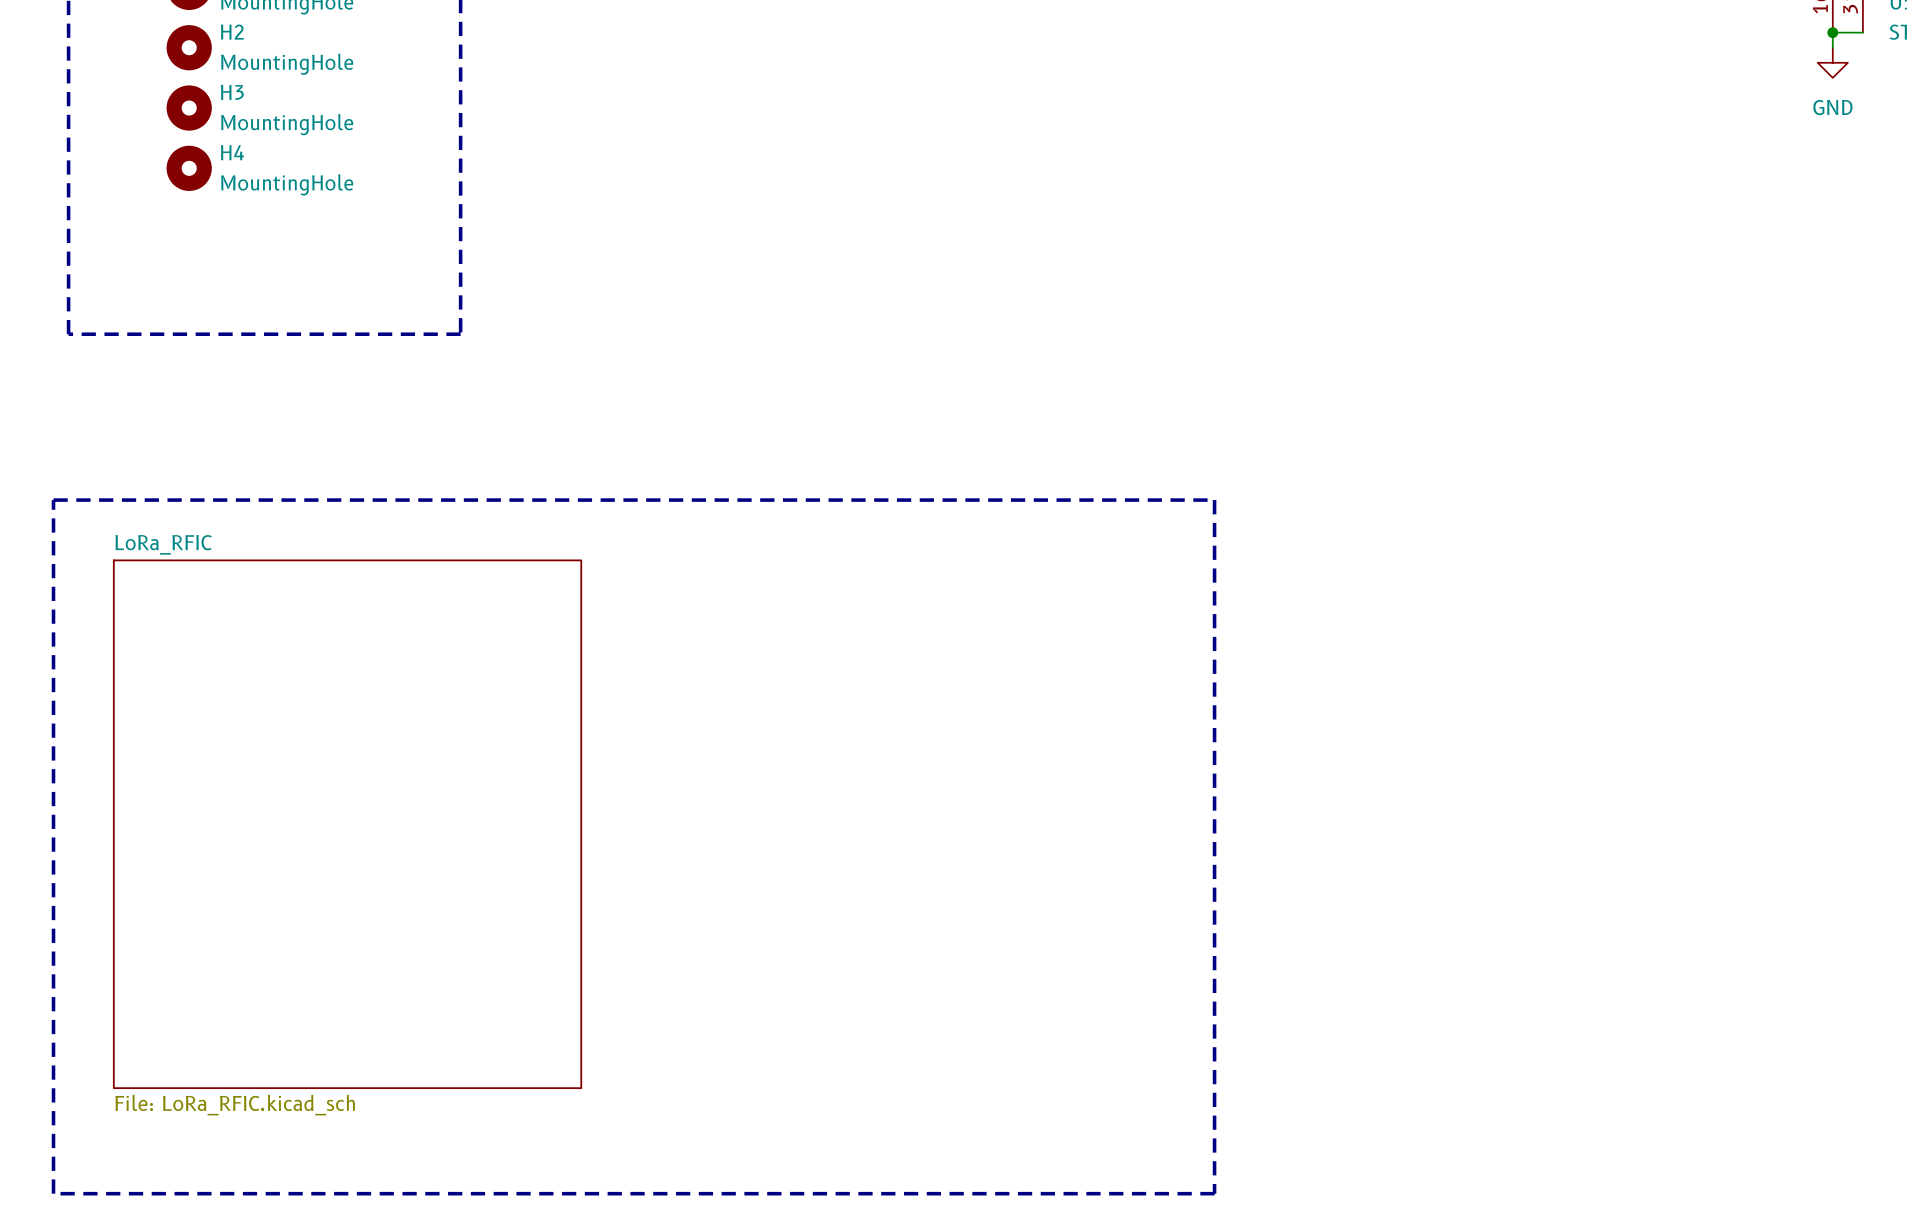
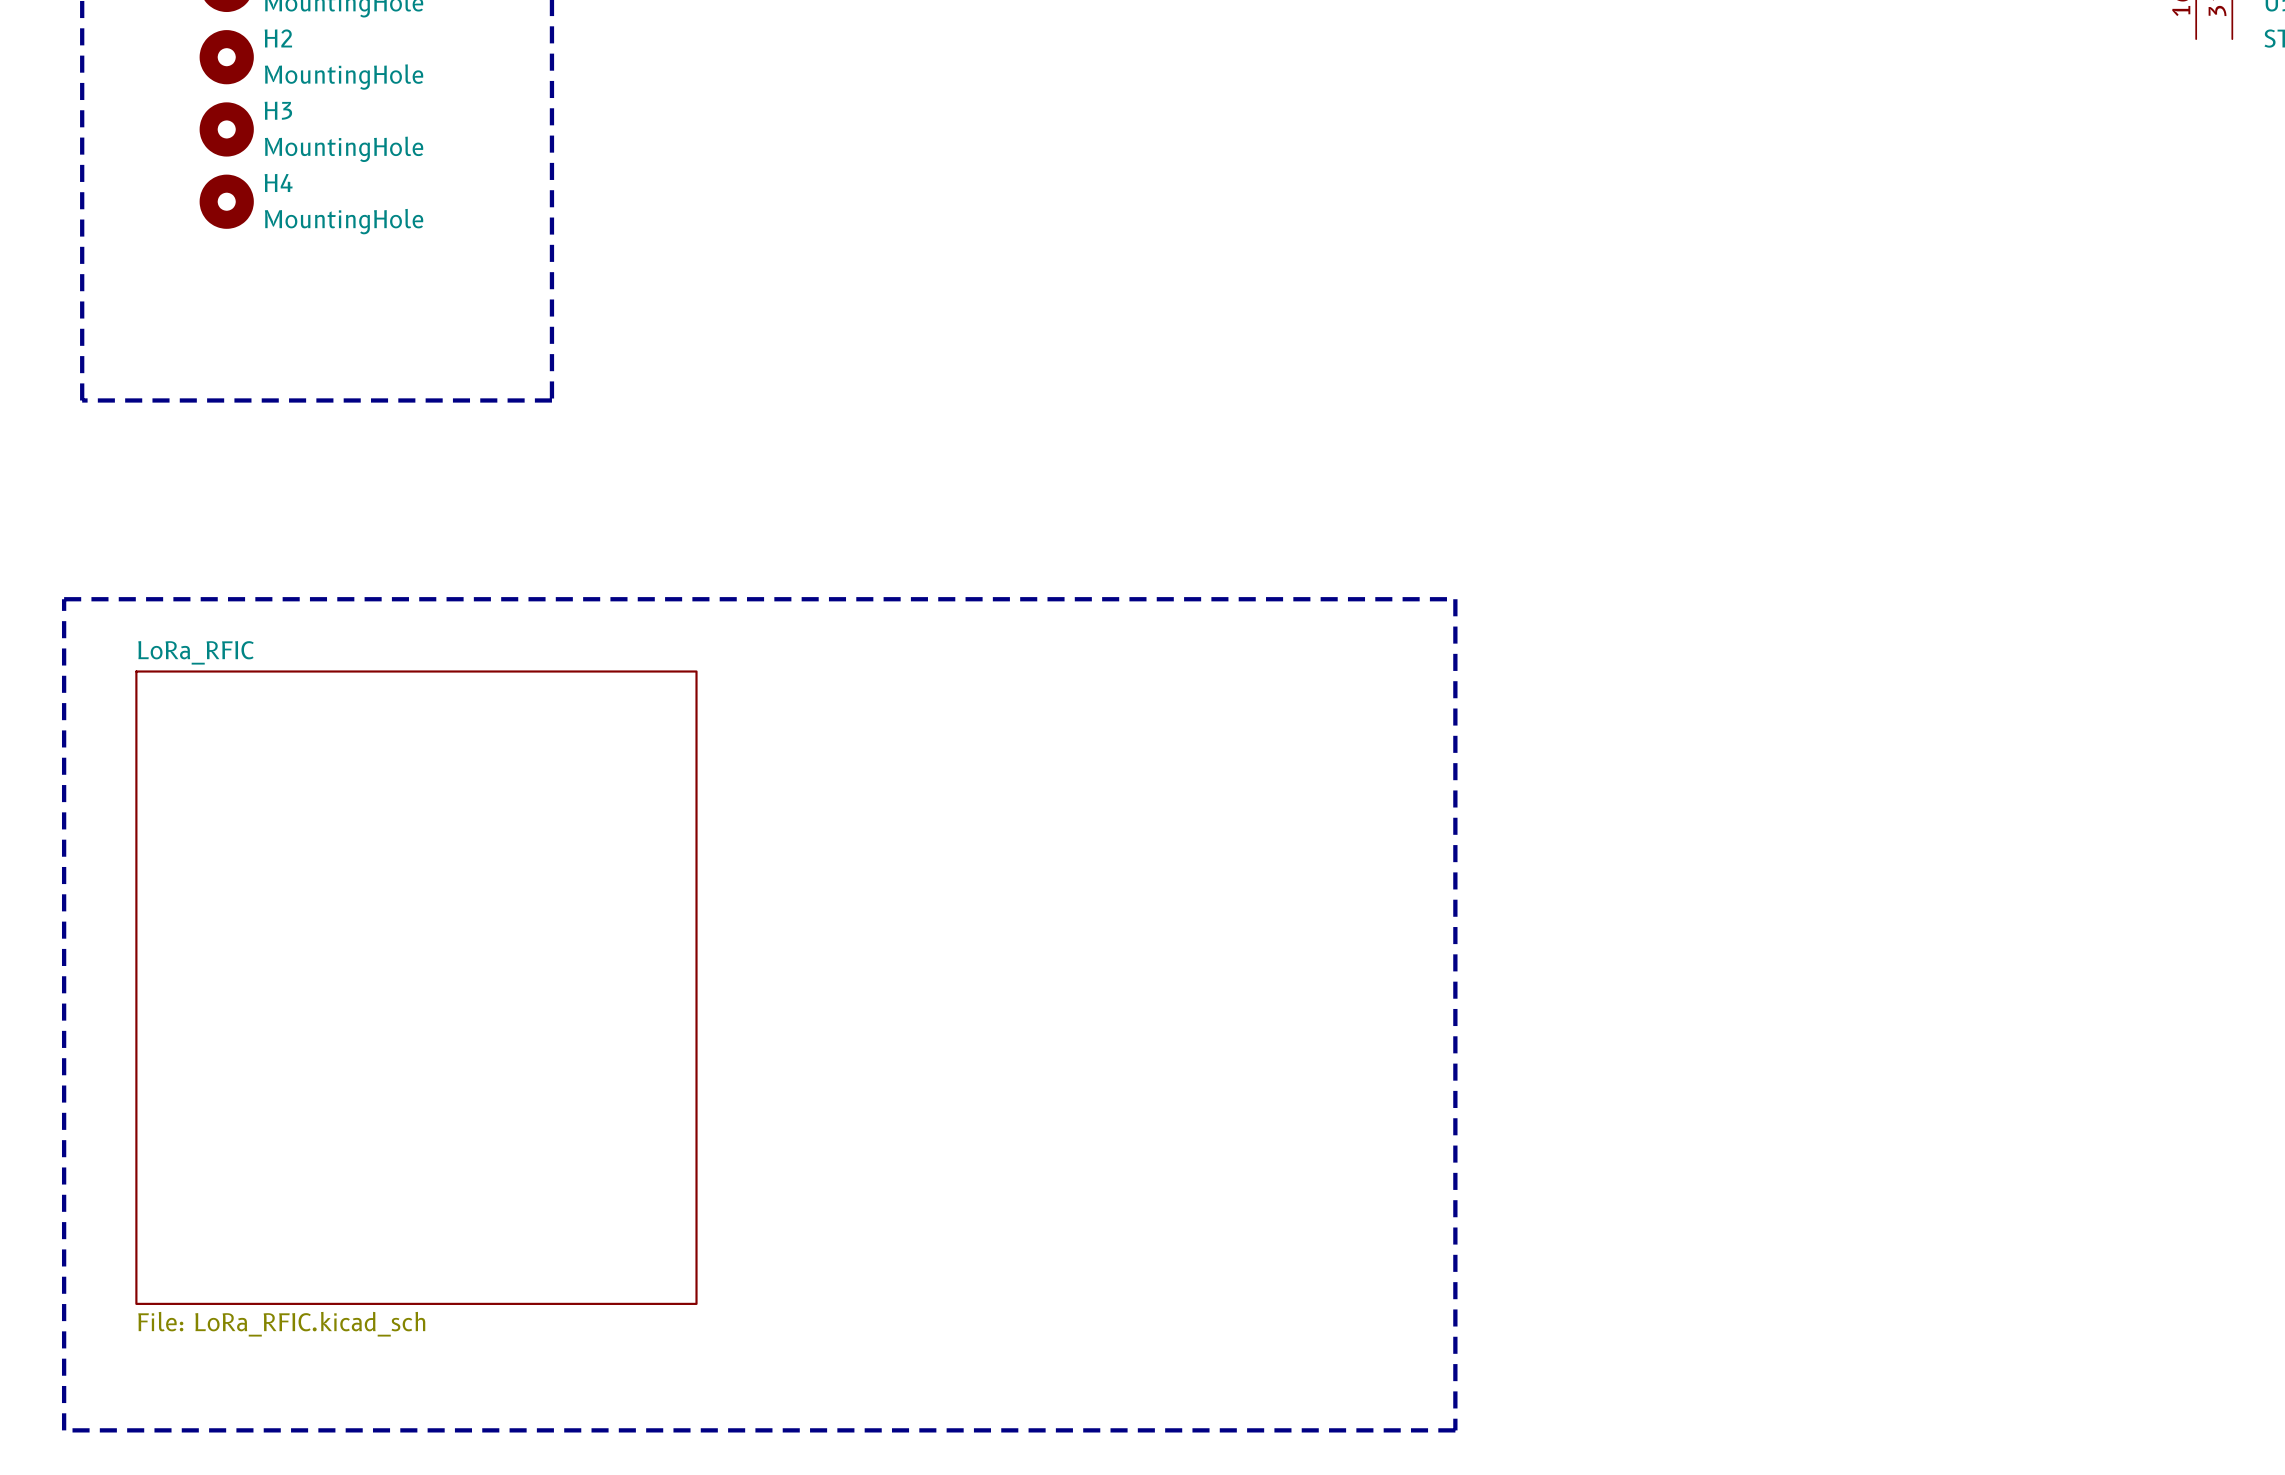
junction: (1832, 32) -> none
wire: (1862, 32) (1832, 32) (1832, 47) -> none
power symbol: GND (1832, 62) -> none

